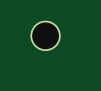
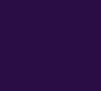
part: (45, 35) -> none

